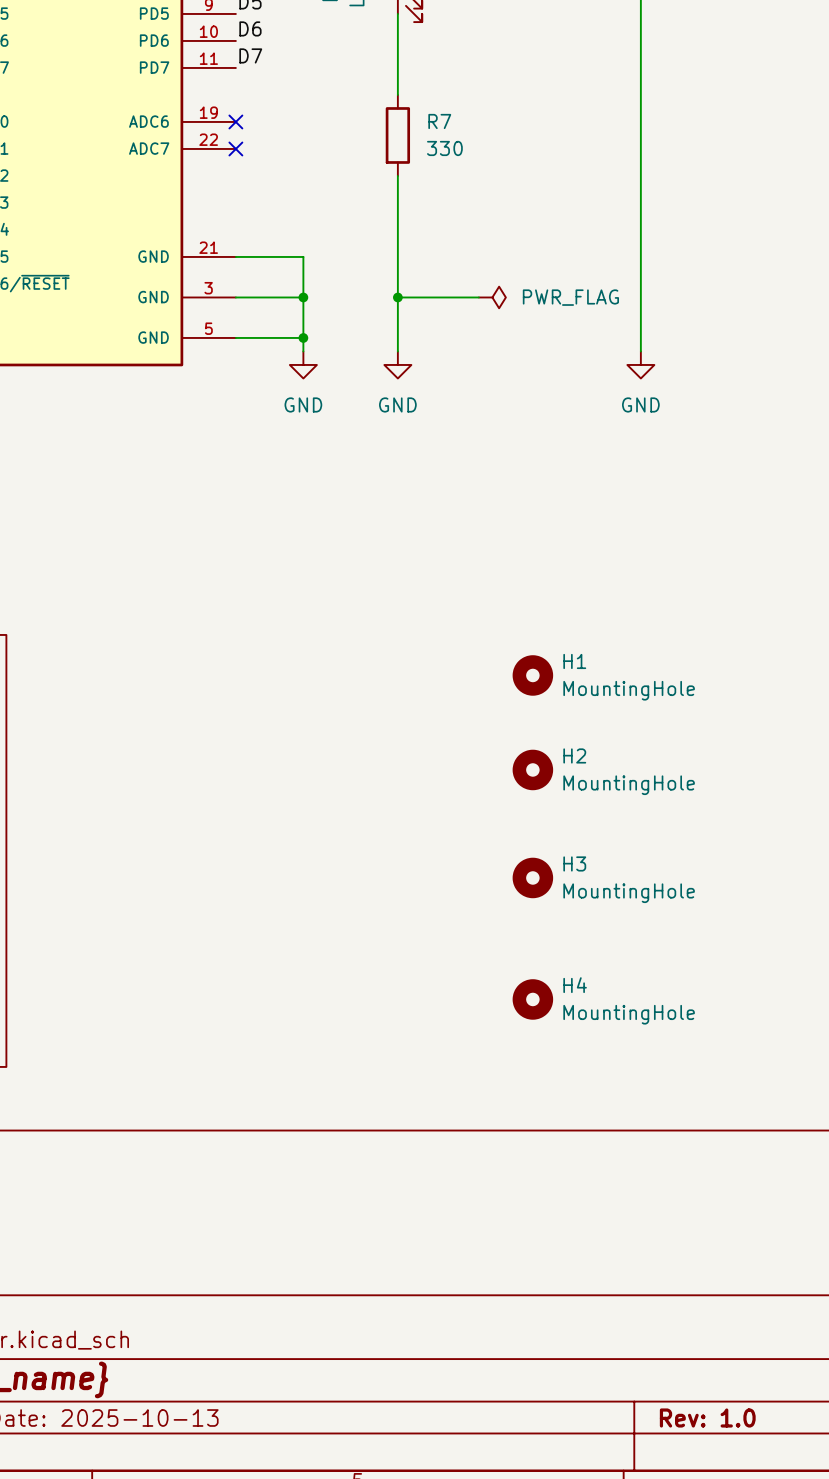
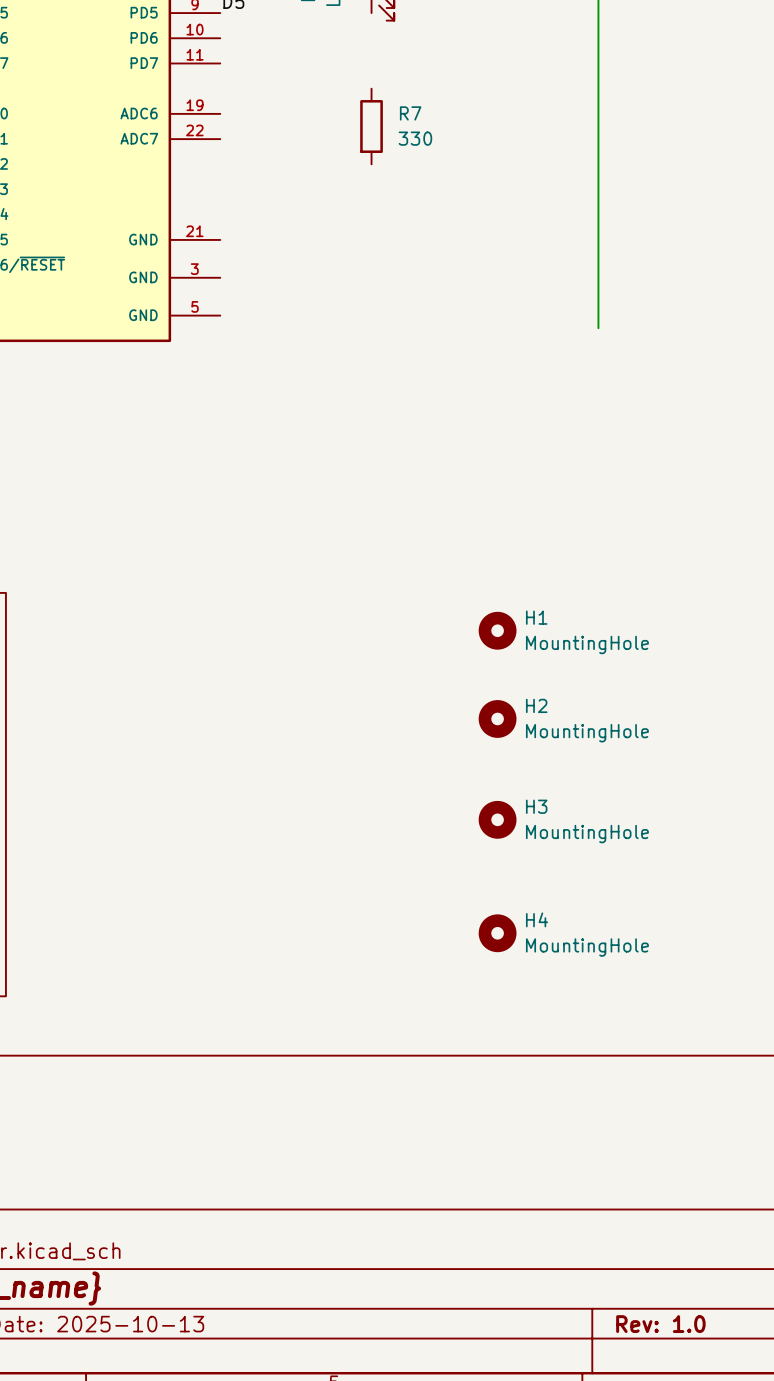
wire: (397, 13) (397, 94) -> none
label: D6 (250, 28) -> none
label: D7 (250, 55) -> none
no-connect mark: (235, 121) -> none
no-connect mark: (235, 148) -> none
wire: (397, 175) (397, 351) -> none
wire: (235, 256) (303, 256) (303, 351) -> none
wire: (235, 297) (303, 297) -> none
junction: (303, 297) -> none
wire: (397, 297) (478, 297) -> none
junction: (397, 297) -> none
power symbol: PWR_FLAG (492, 297) -> none
wire: (235, 337) (303, 337) -> none
junction: (303, 337) -> none
power symbol: GND (303, 364) -> none
power symbol: GND (397, 364) -> none
power symbol: GND (640, 364) -> none

